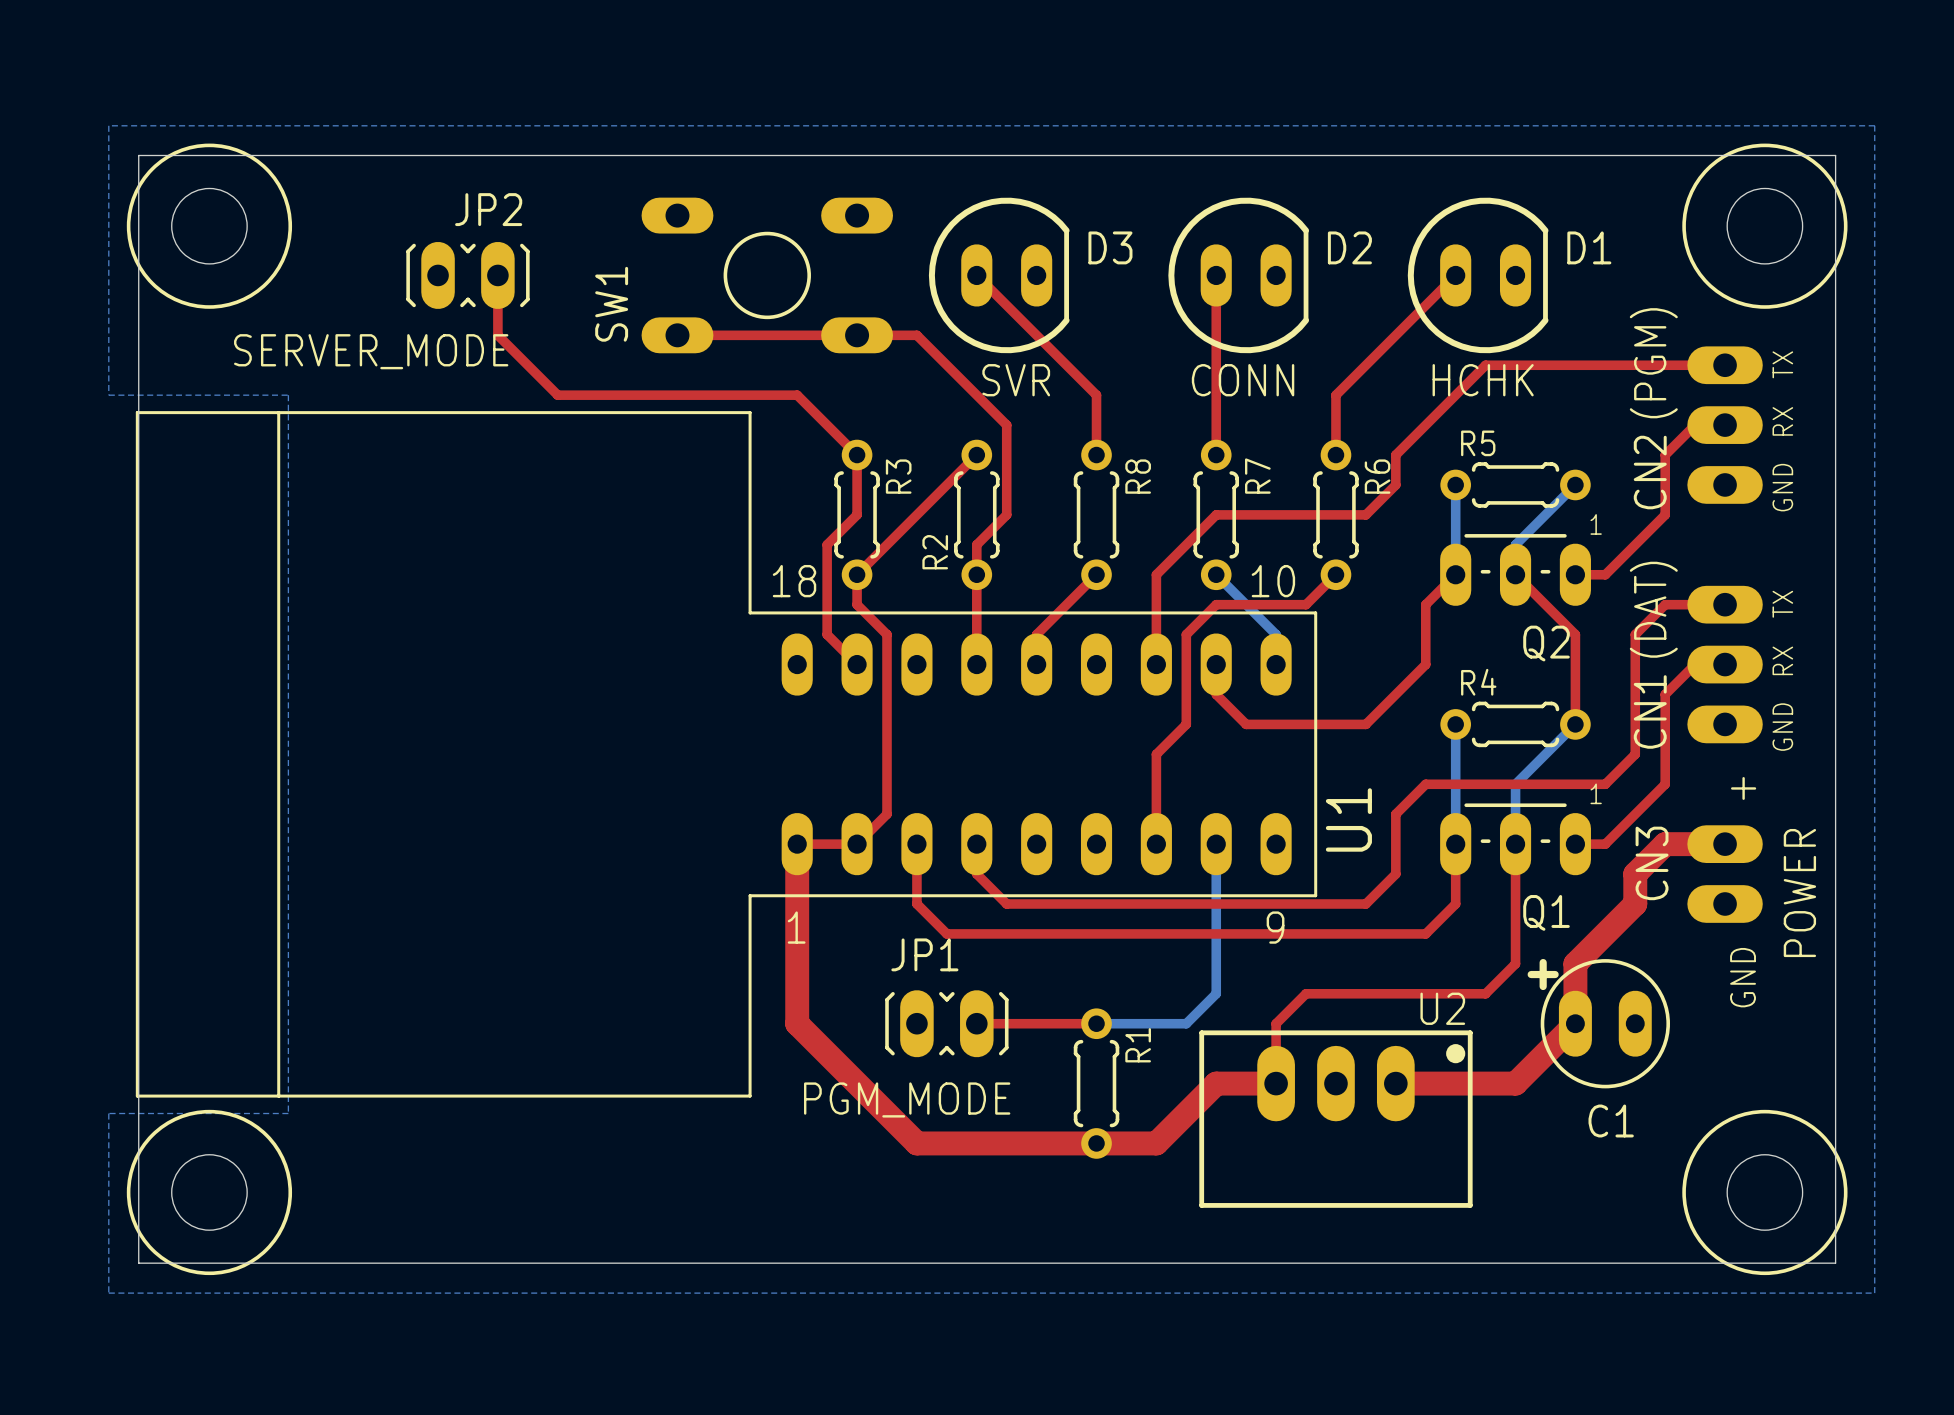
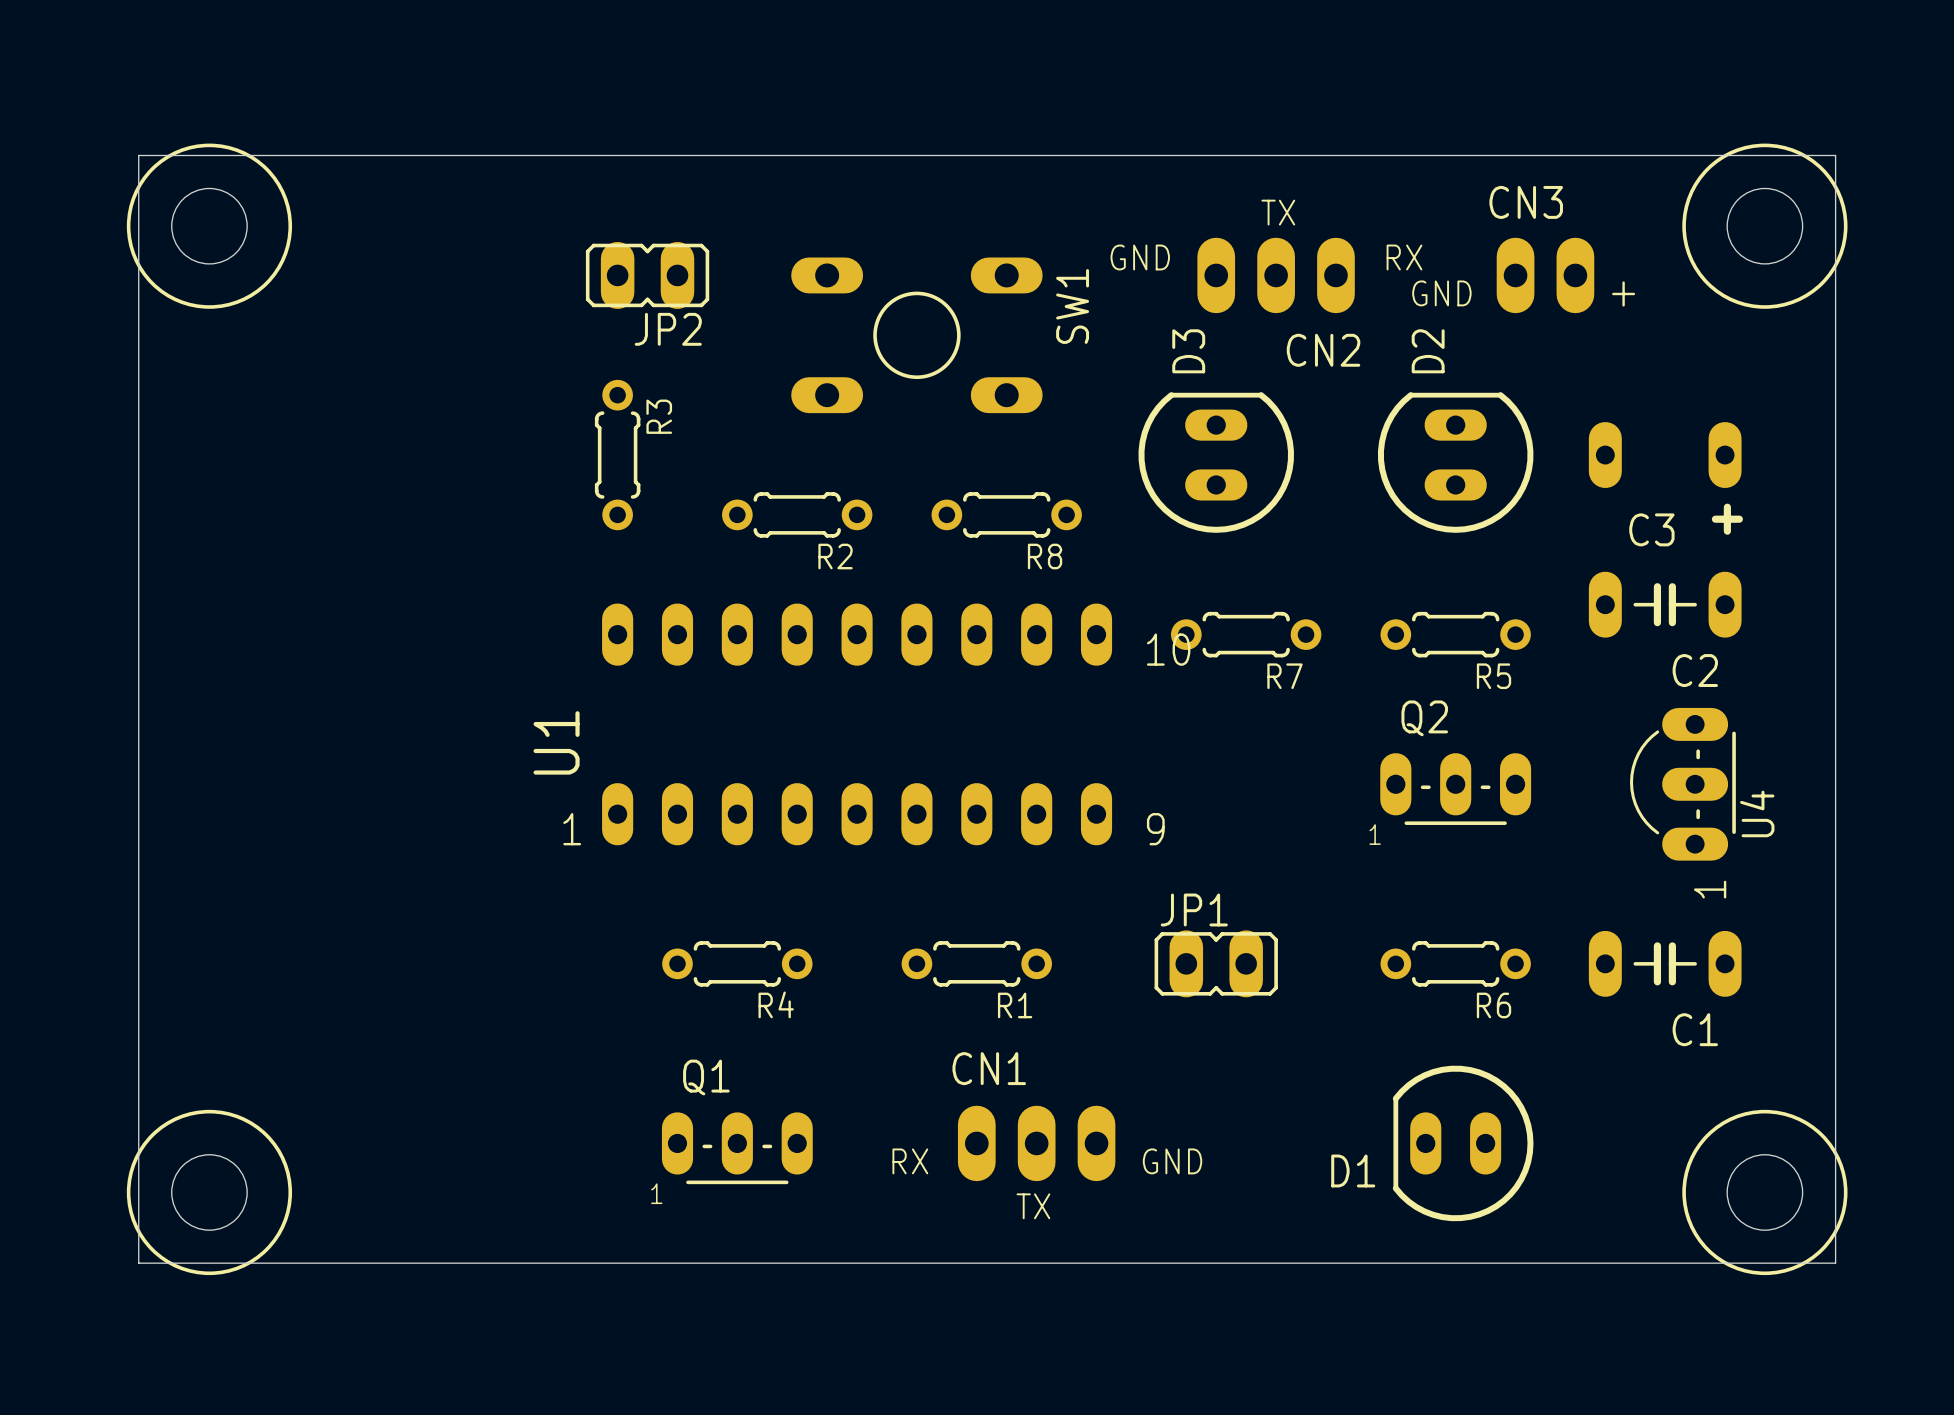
bottom zone outline: (108, 125) (108, 395) (288, 395) (288, 1113) (108, 1113) (108, 1293) (1874, 1293) (1874, 125) (108, 125) -> none
JP2 name position: JP2 (488, 209) -> JP2 (668, 329)
JP2 footprint: [406, 241, 530, 309] -> [585, 241, 710, 309]
top track: (497, 275) (497, 335) (557, 395) (797, 395) (857, 455) (857, 514) (827, 544) (827, 634) (857, 664) -> none
SW1 position: (767, 275) -> (916, 335)
top track: (976, 275) (1096, 395) (1096, 455) -> none
D3 rotation: 0° (999, 275) -> 90° counterclockwise (1216, 462)
D3 position: (999, 275) -> (1216, 462)
top track: (1216, 275) (1216, 455) -> none
D2 rotation: 0° (1238, 275) -> 90° counterclockwise (1455, 462)
D2 position: (1238, 275) -> (1455, 462)
top track: (1455, 275) (1335, 395) (1335, 455) -> none
D1 rotation: 0° (1478, 275) -> 180° (1463, 1143)
D1 position: (1478, 275) -> (1463, 1143)
SW1 name position: SW1 (611, 304) -> SW1 (1072, 306)
top track: (677, 335) (916, 335) (1006, 425) (1006, 514) (976, 544) (976, 664) -> none
CN2 footprint: [1687, 346, 1763, 504] -> [1197, 237, 1355, 314]
text: SERVER_MODE (371, 351) -> none
text: (PGM) (1653, 363) -> none
top track: (1725, 365) (1485, 365) (1395, 455) (1395, 484) (1365, 514) (1216, 514) (1156, 574) (1156, 664) -> none
text: SVR (1016, 380) -> none
text: CONN (1243, 380) -> none
text: HCHK (1483, 380) -> none
U1 footprint: [135, 411, 1318, 1098] -> [602, 603, 1113, 846]
top track: (1725, 425) (1695, 425) (1665, 455) (1665, 514) (1605, 574) (1575, 574) -> none
R5 name position: R5 (1478, 443) -> R5 (1494, 676)
top track: (976, 455) (857, 574) (857, 604) (887, 634) (887, 814) (857, 844) (797, 844) (797, 1023) (916, 1143) (1156, 1143) (1216, 1083) (1276, 1083) (1276, 1023) (1306, 993) (1485, 993) (1515, 963) (1515, 844) -> none
CN2 name position: CN2 (1650, 472) -> CN2 (1323, 350)
C3: none -> (1665, 478)
bottom track: (1455, 484) (1455, 574) -> none
R5 position: (1515, 484) -> (1455, 634)
bottom track: (1575, 484) (1515, 544) (1515, 574) -> none
R3 position: (857, 514) -> (617, 455)
R2 rotation: 0° (976, 514) -> 90° clockwise (797, 514)
R2 position: (976, 514) -> (797, 514)
R8 rotation: 0° (1096, 514) -> 90° clockwise (1006, 514)
R7 rotation: 0° (1216, 514) -> 90° clockwise (1246, 634)
R7 position: (1216, 514) -> (1246, 634)
R6 rotation: 0° (1335, 514) -> 90° clockwise (1455, 963)
R6 position: (1335, 514) -> (1455, 963)
Q2 footprint: [1440, 534, 1591, 606] -> [1380, 753, 1532, 825]
R2 name position: R2 (935, 552) -> R2 (835, 556)
top track: (1096, 574) (1036, 634) (1036, 664) -> none
bottom track: (1216, 574) (1276, 634) (1276, 664) -> none
top track: (1335, 574) (1306, 604) (1216, 604) (1186, 634) (1186, 724) (1156, 754) (1156, 844) -> none
top track: (1455, 574) (1425, 604) (1425, 664) (1365, 724) (1246, 724) (1216, 694) (1216, 664) -> none
top track: (1515, 574) (1575, 634) (1575, 724) -> none
CN1 footprint: [1687, 585, 1763, 744] -> [957, 1105, 1116, 1182]
C2: none -> (1665, 604)
top track: (1725, 604) (1665, 604) (1635, 634) (1635, 754) (1605, 784) (1425, 784) (1395, 814) (1395, 874) (1365, 904) (1006, 904) (976, 874) (976, 844) -> none
text: (DAT) (1653, 609) -> none
Q2 name position: Q2 (1546, 643) -> Q2 (1424, 718)
top track: (1725, 664) (1695, 664) (1665, 694) (1665, 784) (1605, 844) (1575, 844) -> none
R4 name position: R4 (1478, 682) -> R4 (776, 1004)
CN1 name position: CN1 (1650, 711) -> CN1 (989, 1068)
bottom track: (1455, 724) (1455, 844) -> none
R4 position: (1515, 724) -> (737, 963)
bottom track: (1575, 724) (1515, 784) (1515, 844) -> none
U4: none -> (1682, 784)
Q1 footprint: [1440, 803, 1591, 876] -> [661, 1112, 813, 1185]
U1 name position: U1 (1348, 819) -> U1 (556, 742)
CN3 footprint: [1687, 825, 1763, 923] -> [1496, 237, 1595, 314]
top track: (916, 844) (916, 904) (946, 933) (1425, 933) (1455, 904) (1455, 844) -> none
bottom track: (1216, 844) (1216, 993) (1186, 1023) (1096, 1023) -> none
top track: (1725, 844) (1665, 844) (1635, 874) (1635, 904) (1575, 963) (1575, 1023) (1515, 1083) (1395, 1083) -> none
CN3 name position: CN3 (1652, 863) -> CN3 (1526, 202)
text: POWER (1799, 893) -> none
Q1 name position: Q1 (1546, 912) -> Q1 (706, 1077)
C1 footprint: [1527, 958, 1670, 1089] -> [1588, 930, 1742, 997]
JP1 footprint: [885, 990, 1009, 1058] -> [1154, 930, 1278, 998]
top track: (976, 1023) (1096, 1023) -> none
R1 rotation: 0° (1096, 1083) -> 90° clockwise (976, 963)
R1 position: (1096, 1083) -> (976, 963)
text: PGM_MODE (907, 1099) -> none
U2: (1335, 1119) -> none

